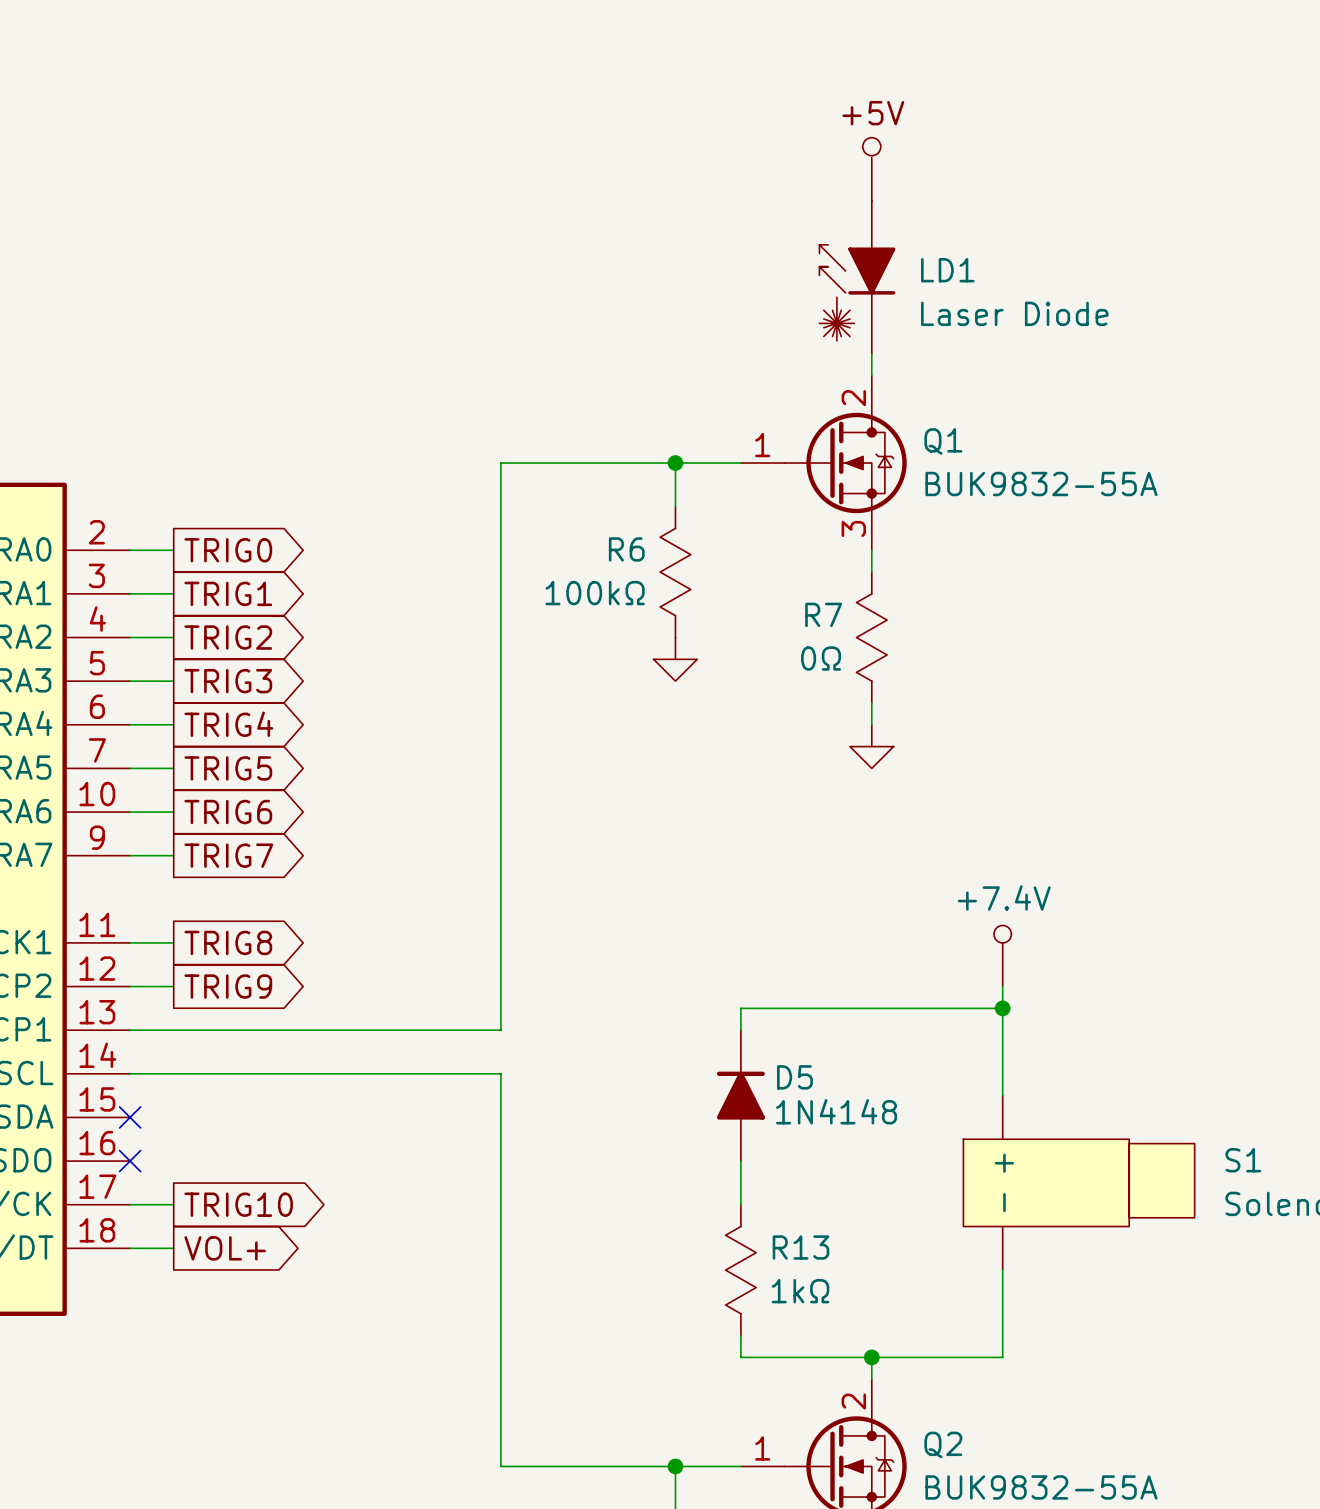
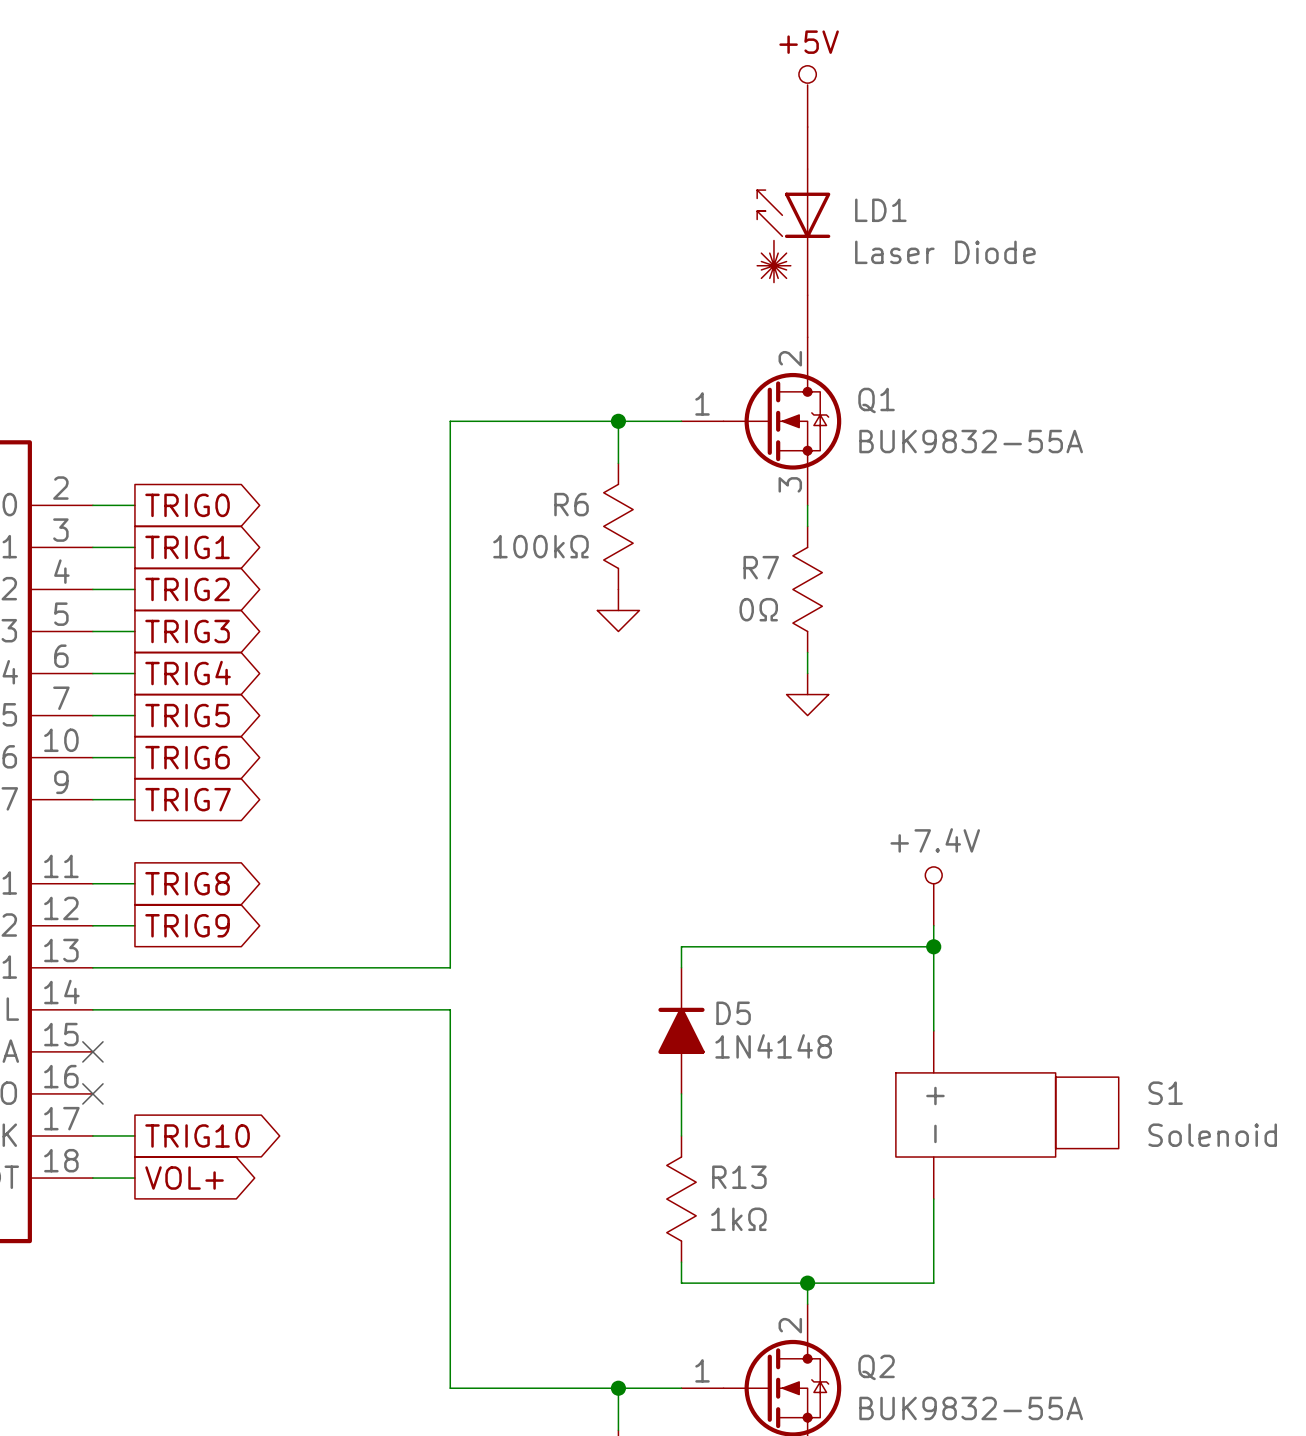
power symbol position: (871, 169) -> (807, 96)
LD1 symbol: [819, 201, 896, 354] -> [757, 127, 831, 338]

